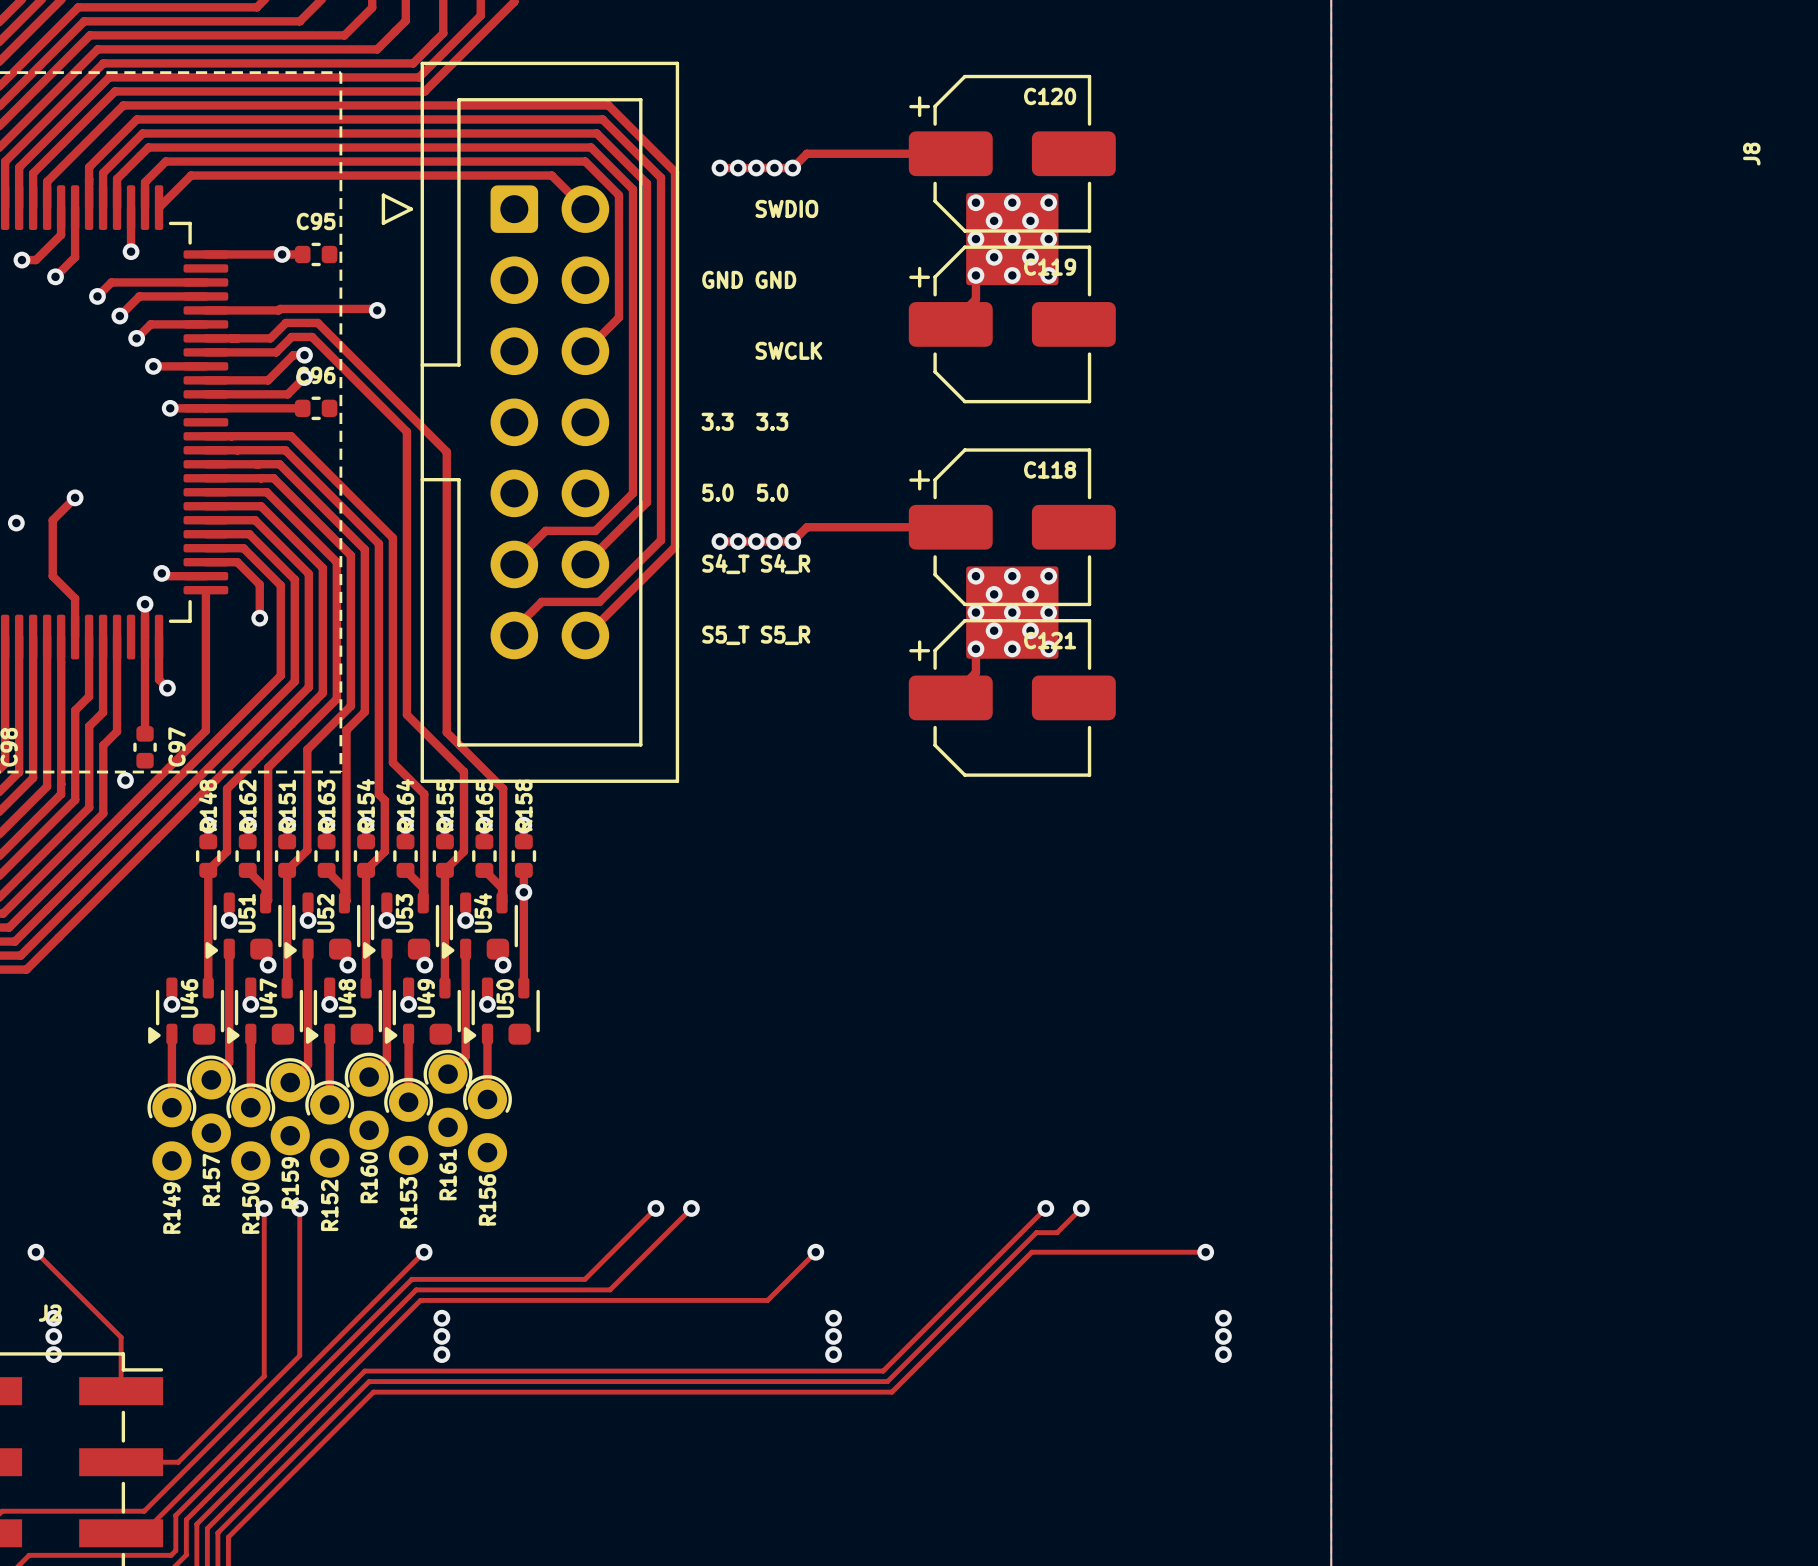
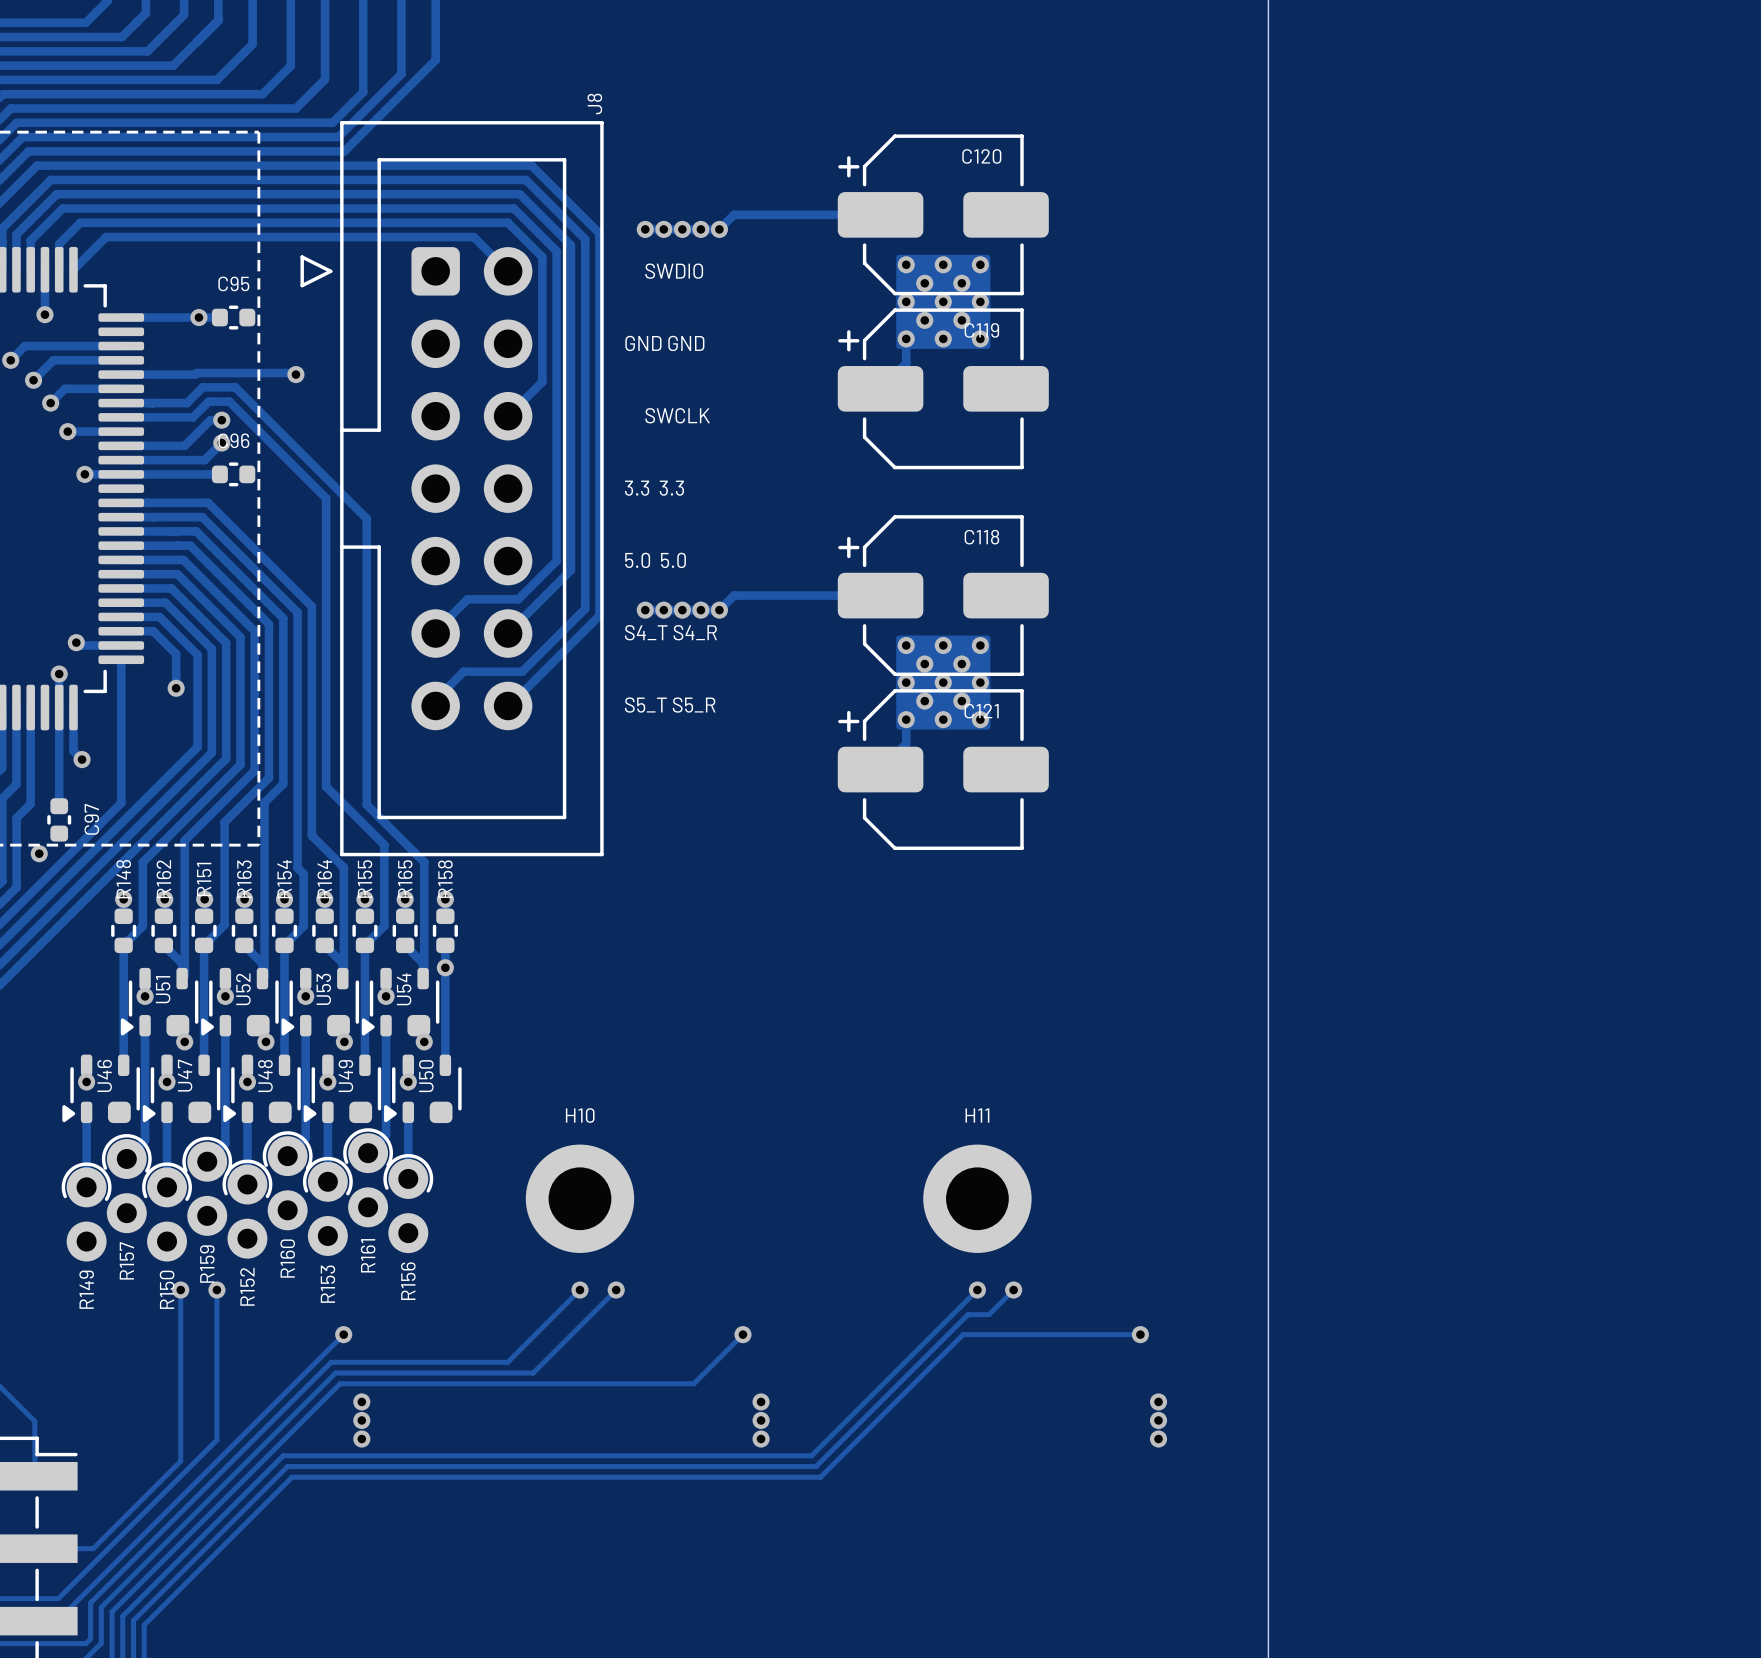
J8 name position: J8 (1751, 154) -> J8 (594, 103)
H10: none -> (579, 1198)
H11: none -> (977, 1198)

